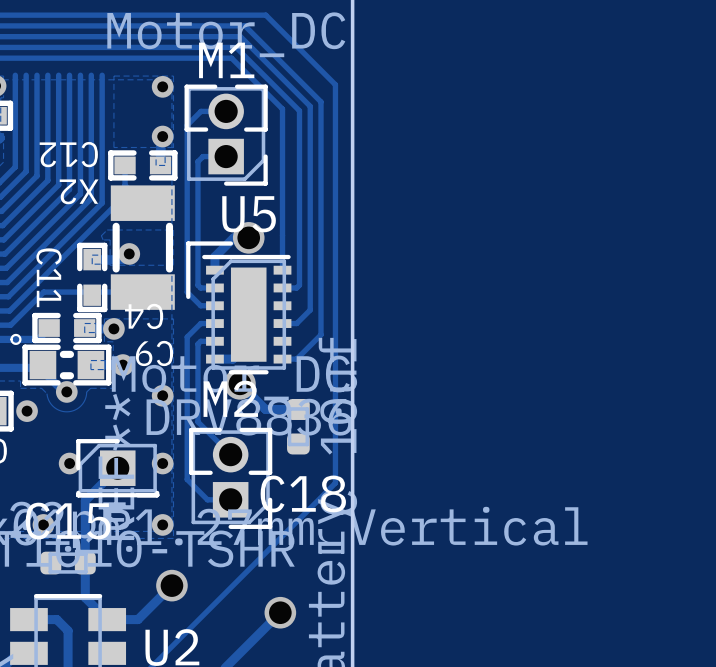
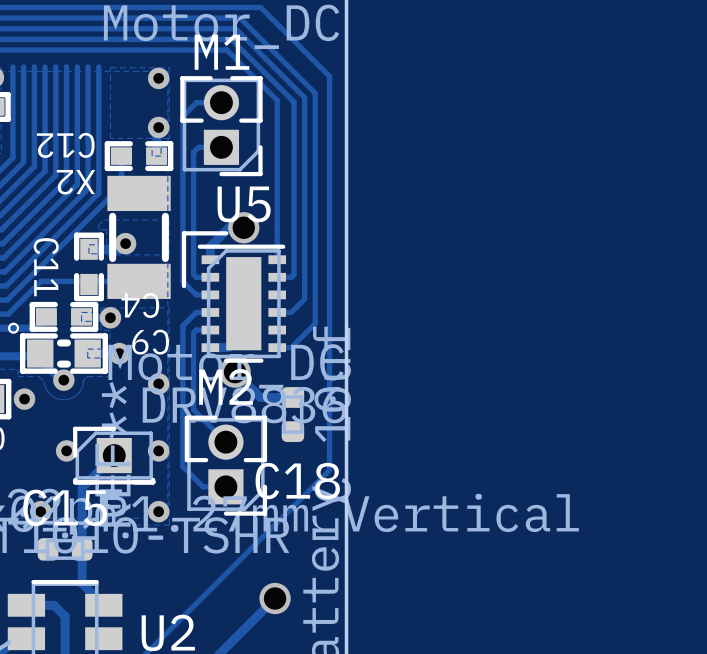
track: (171, 585) (137, 619) (107, 619) -> none
via: (171, 585) -> none

